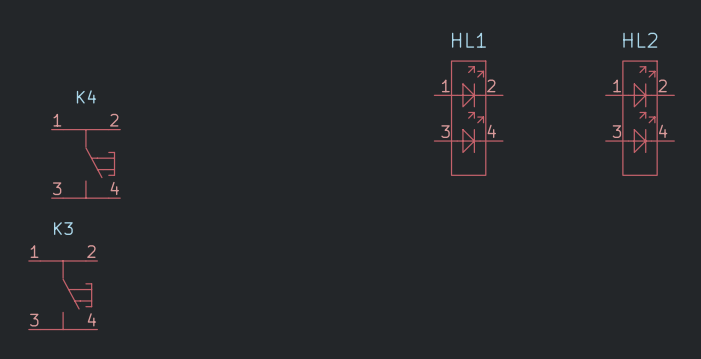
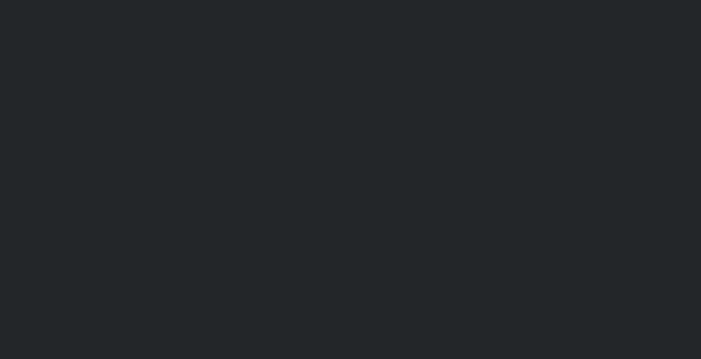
HL1: (468, 118) -> none
HL2: (640, 118) -> none
K4: (85, 163) -> none
K3: (63, 295) -> none

